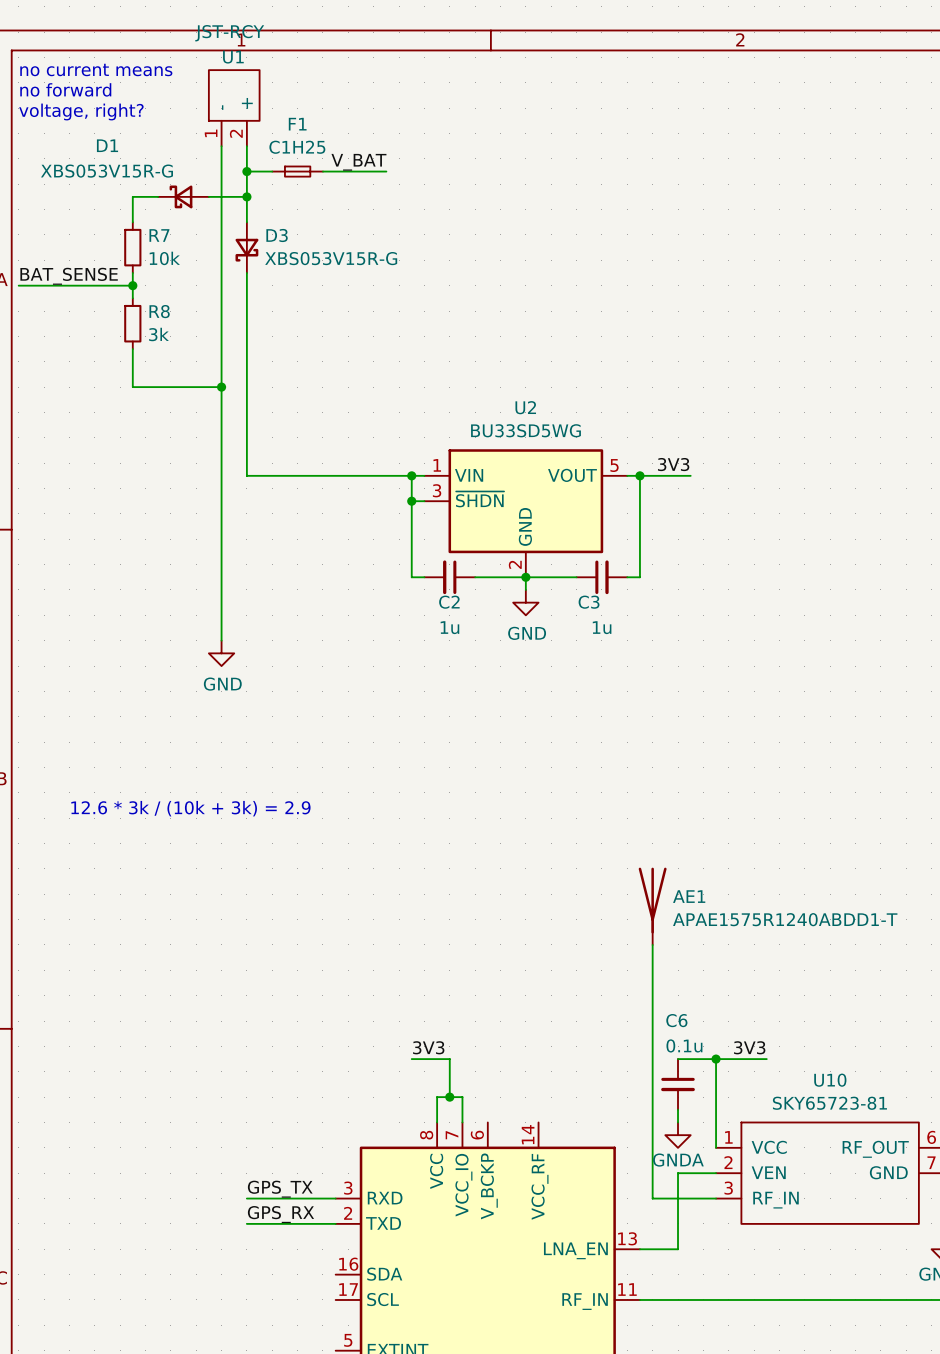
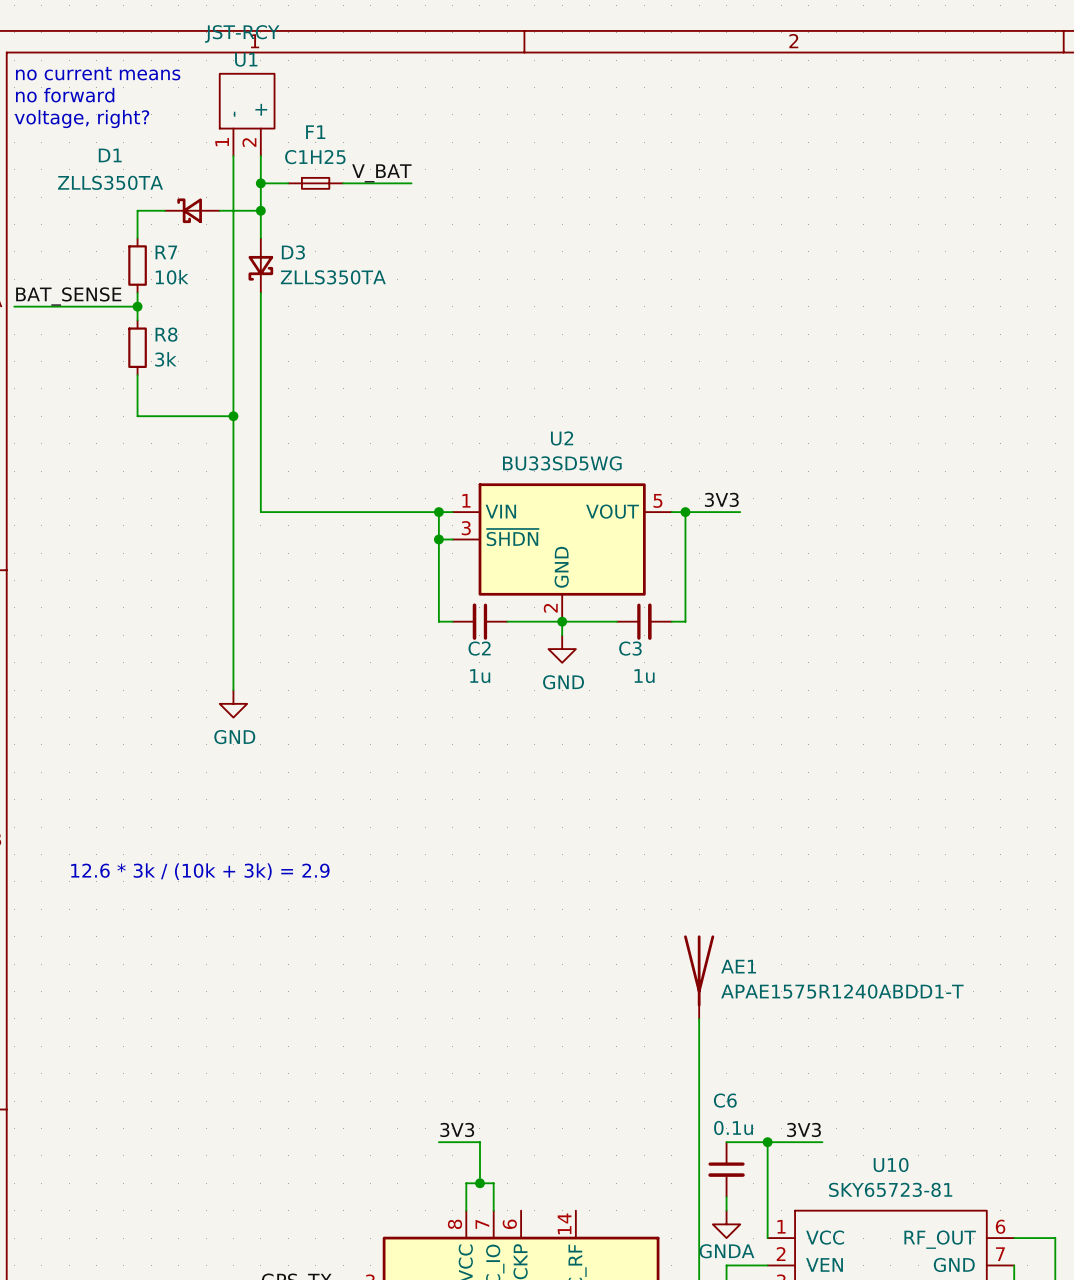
D1 value: XBS053V15R-G (106, 171) -> ZLLS350TA (110, 182)
D3 value: XBS053V15R-G (331, 258) -> ZLLS350TA (333, 277)

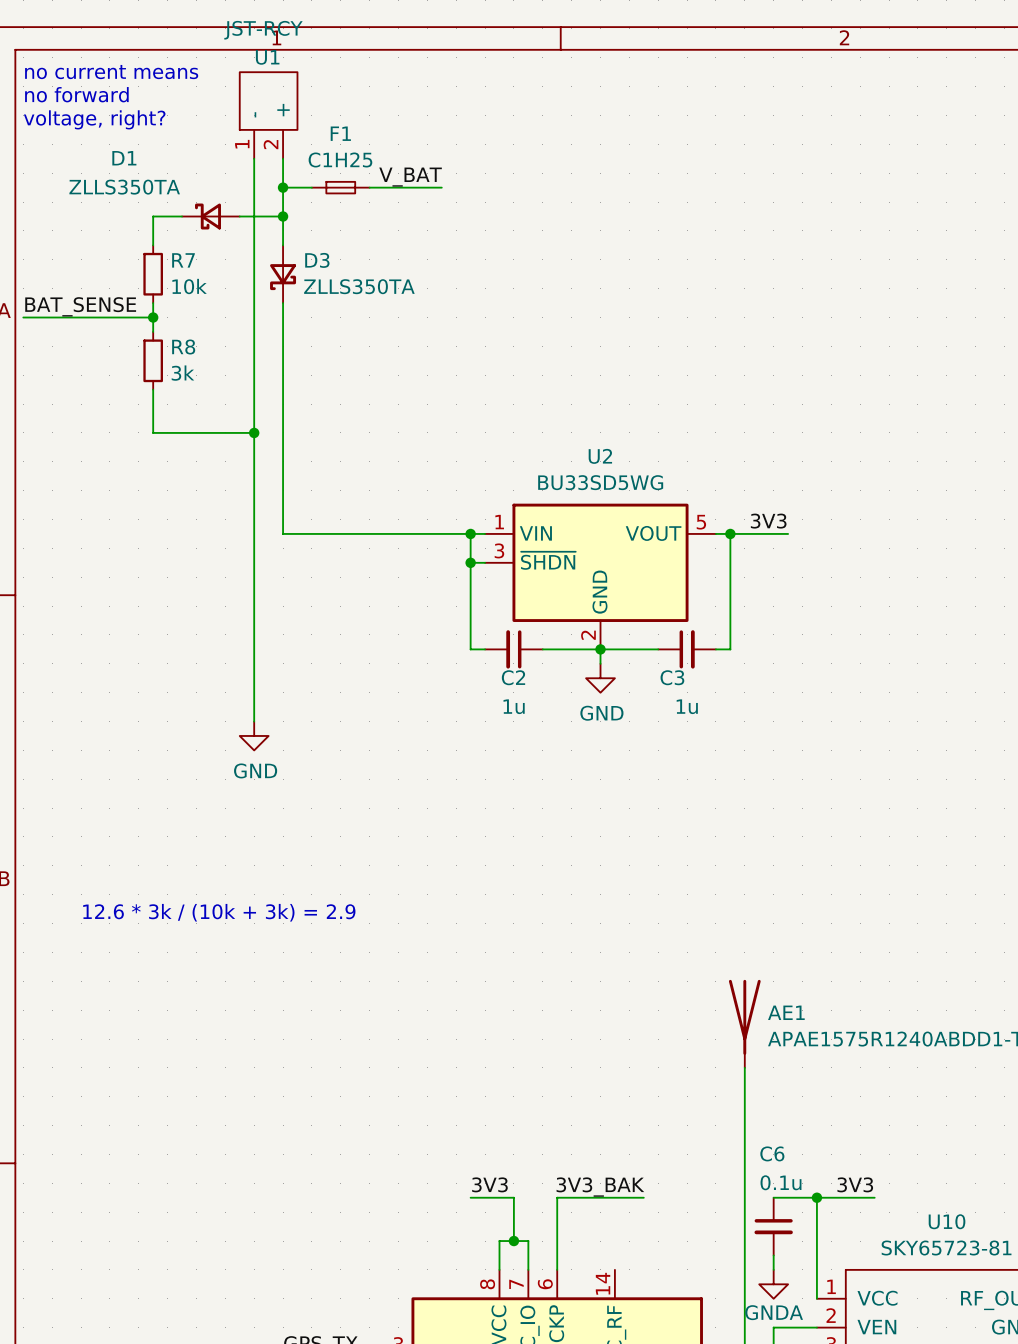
label: none -> 3V3_BAK (600, 1187)
wire: none -> (643, 1197) (557, 1197) (557, 1269)

